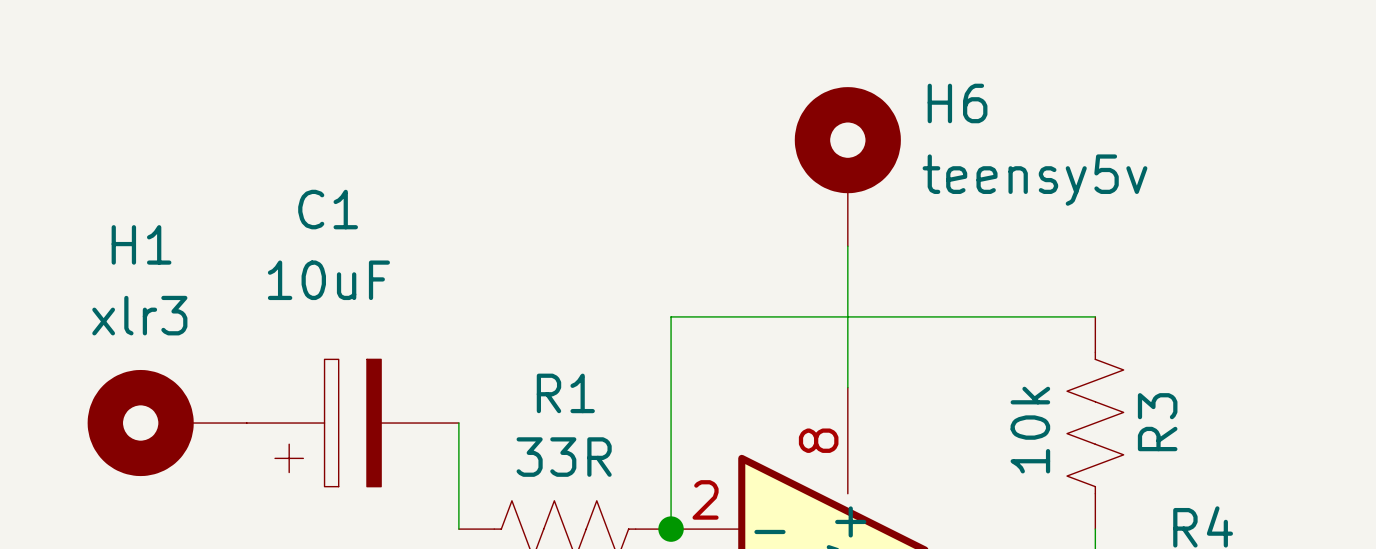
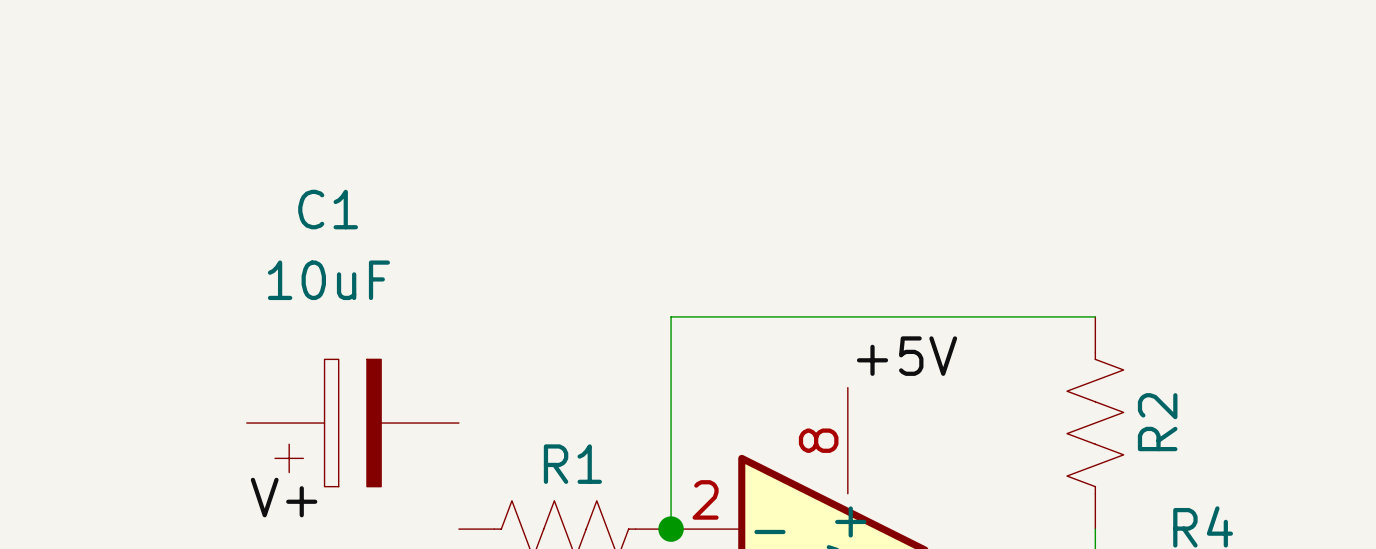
H6: teensy5v (847, 166) -> none
wire: (847, 246) (847, 387) -> none
label: none -> +5V (907, 356)
R1 name position: R1 (565, 393) -> R1 (572, 464)
R3 name: R3 (1157, 422) -> R2 (1157, 422)
H1: xlr3 (167, 423) -> none
wire: (458, 423) (458, 529) -> none
R3 value: 10k (1030, 430) -> none
R1 value: 33R (564, 457) -> none
label: none -> V+ (284, 497)

